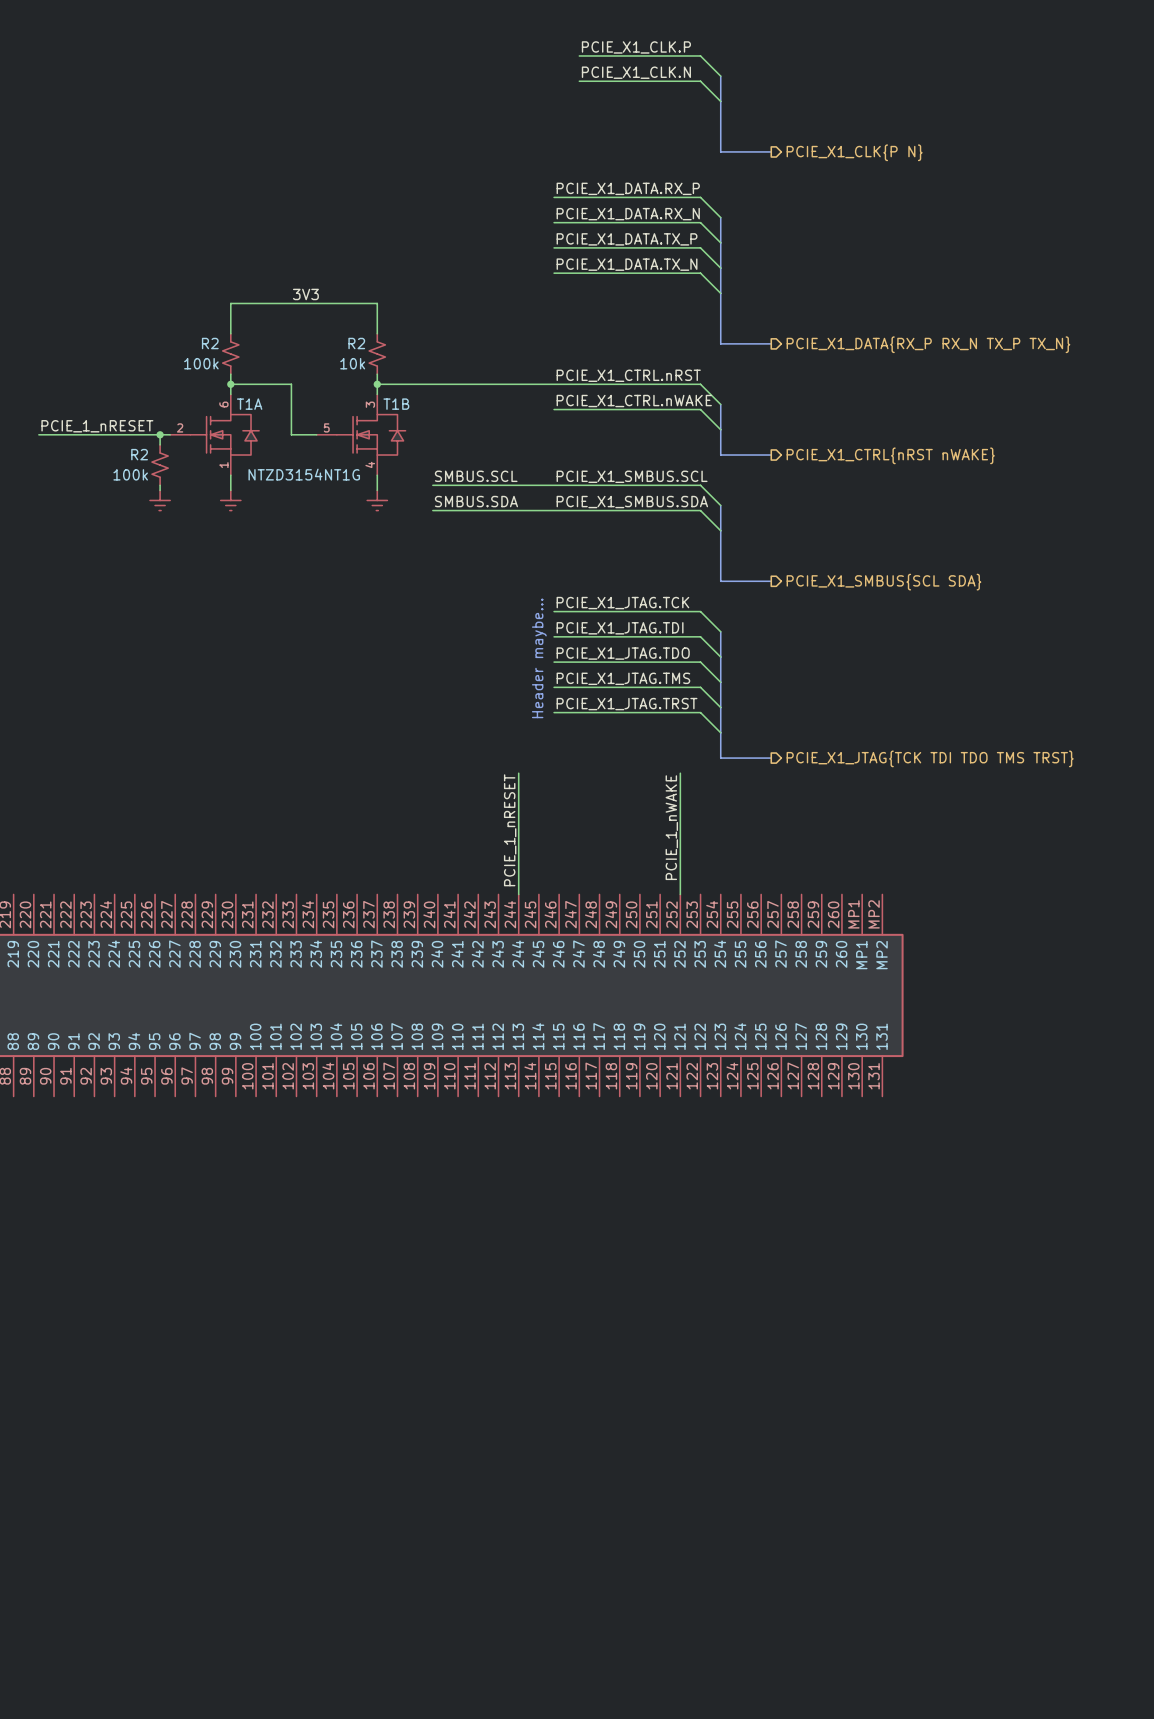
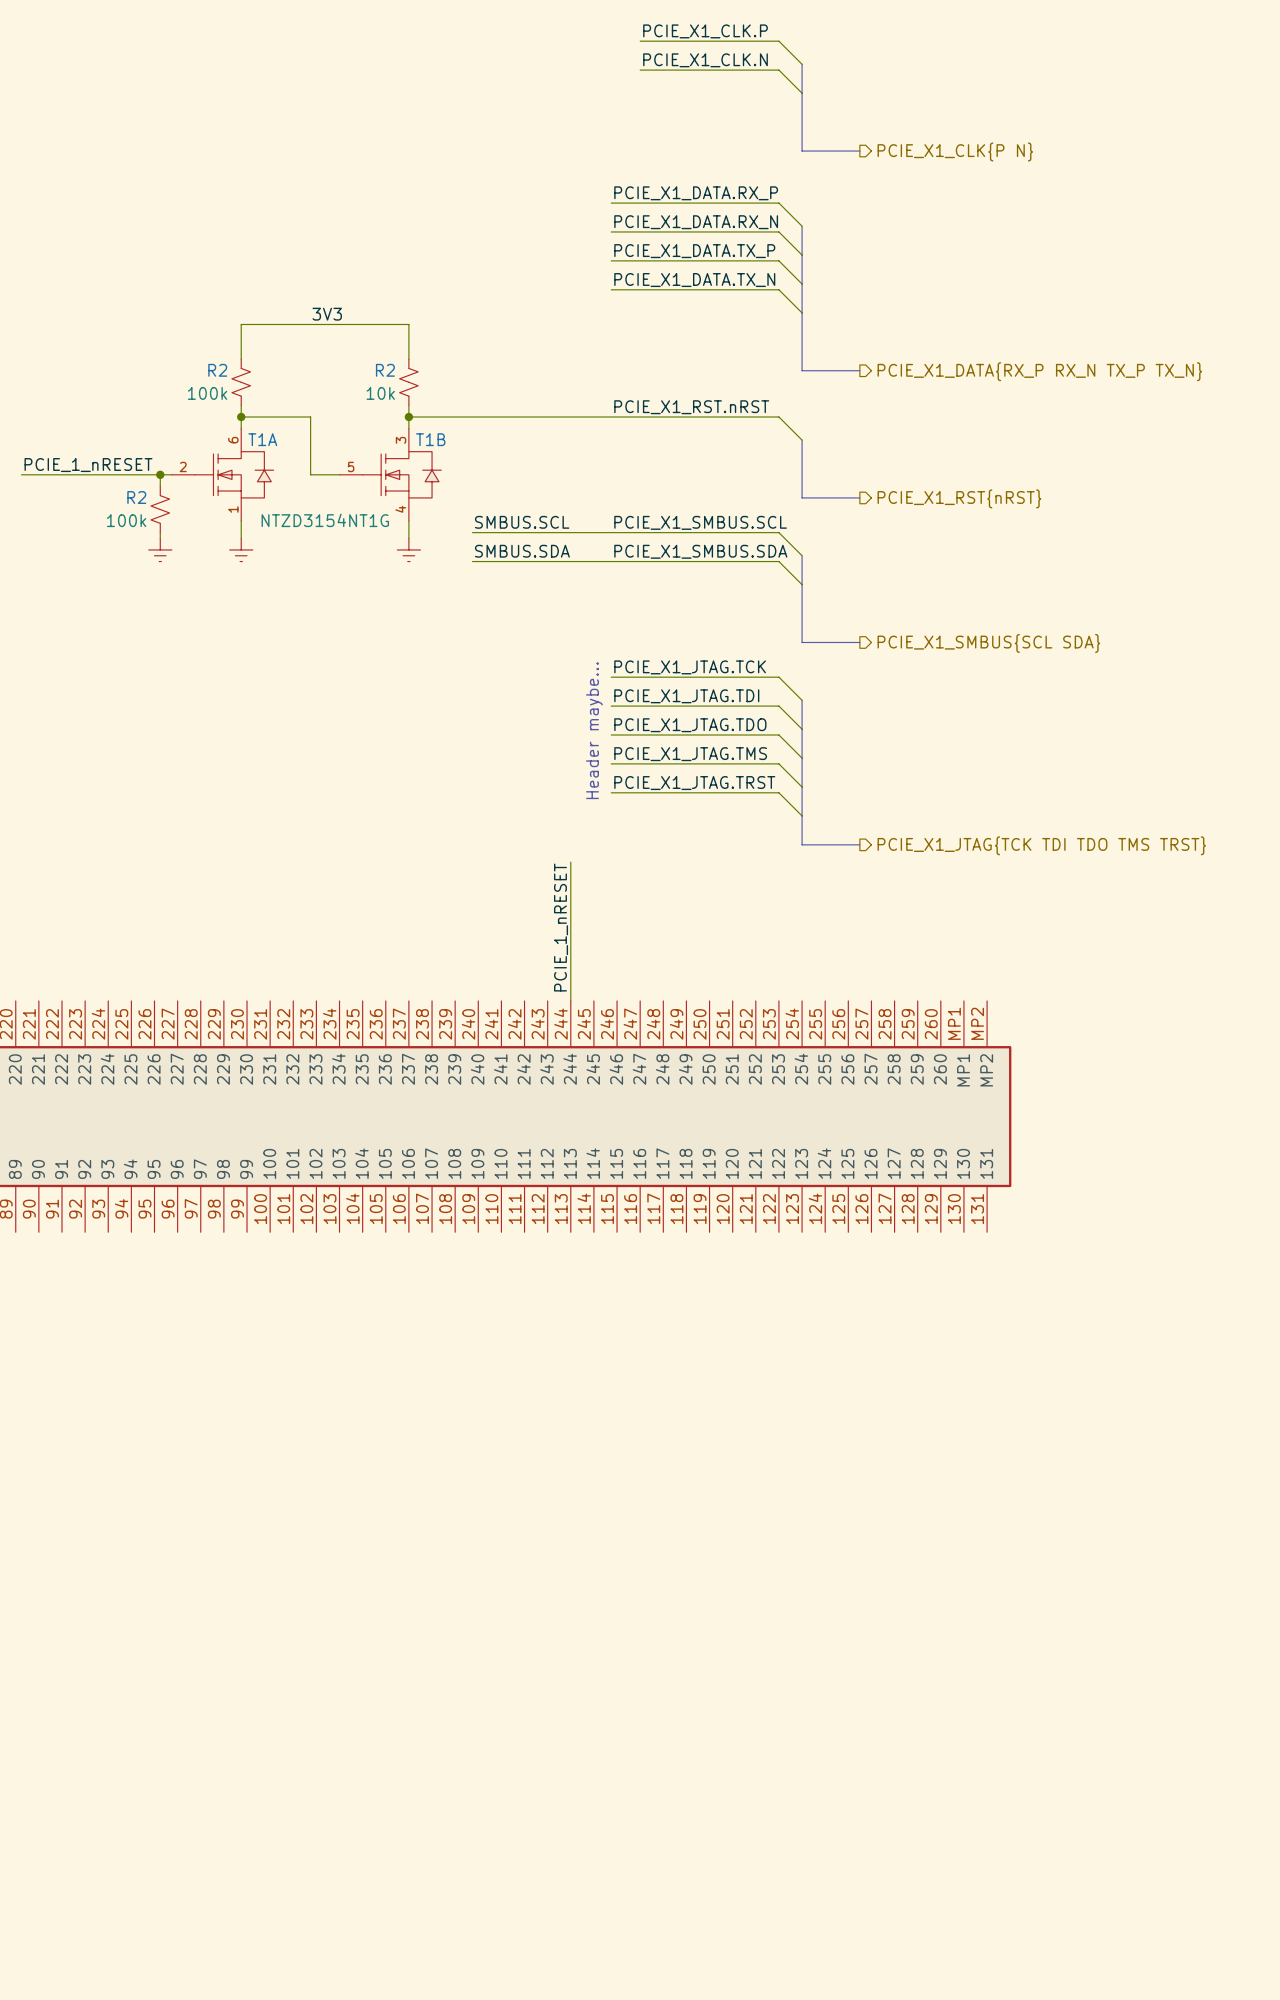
label: PCIE_X1_CTRL.nRST (628, 375) -> PCIE_X1_RST.nRST (691, 407)
label: PCIE_X1_CTRL.nWAKE (634, 401) -> none
wire: (554, 409) (700, 409) (720, 429) -> none
hierarchical label: PCIE_X1_CTRL{nRST nWAKE} (890, 455) -> PCIE_X1_RST{nRST} (959, 498)
wire: (680, 773) (680, 894) -> none
label: PCIE_1_nWAKE (671, 827) -> none

